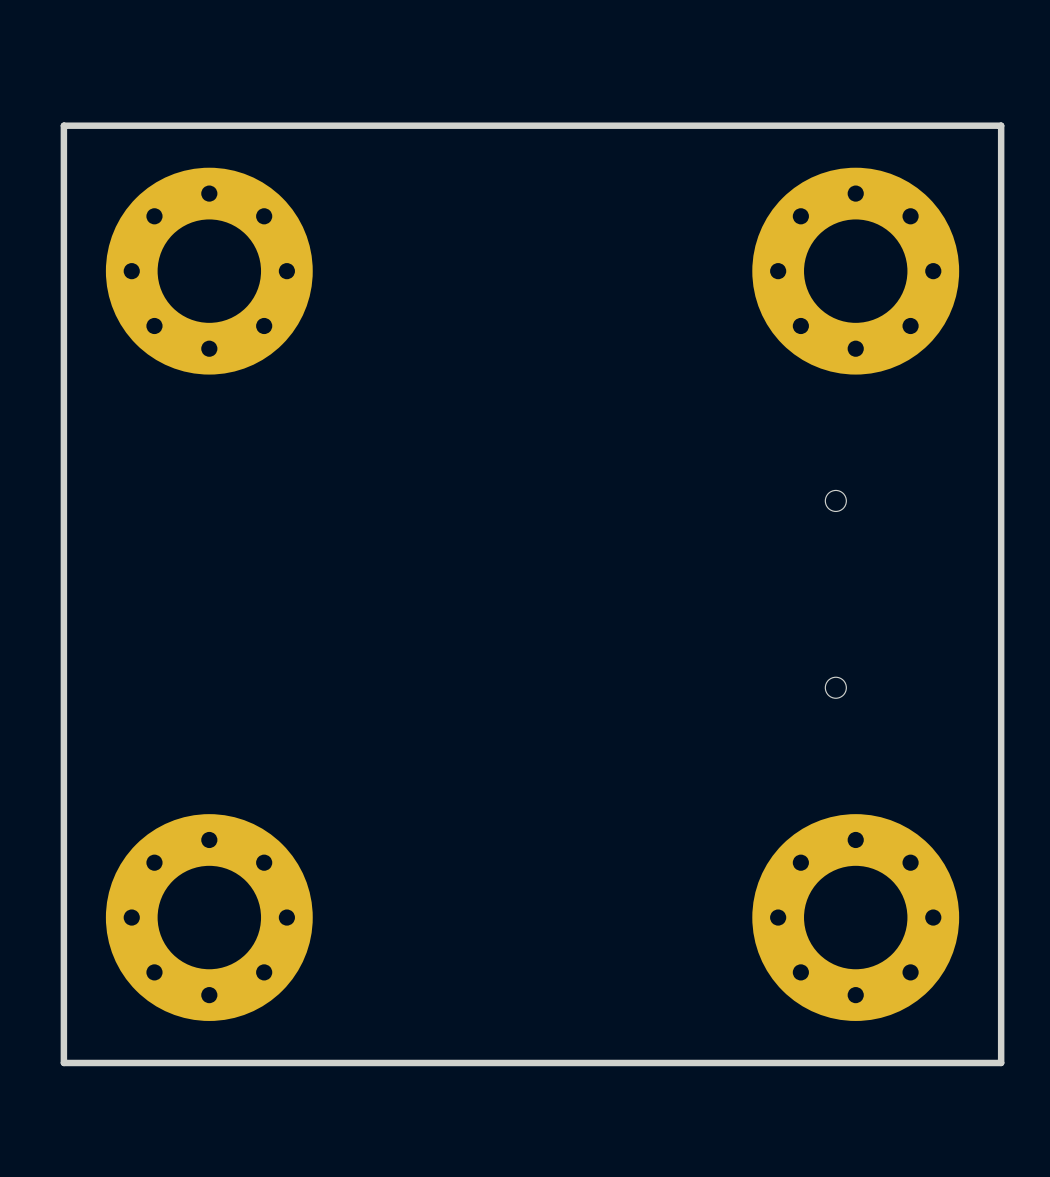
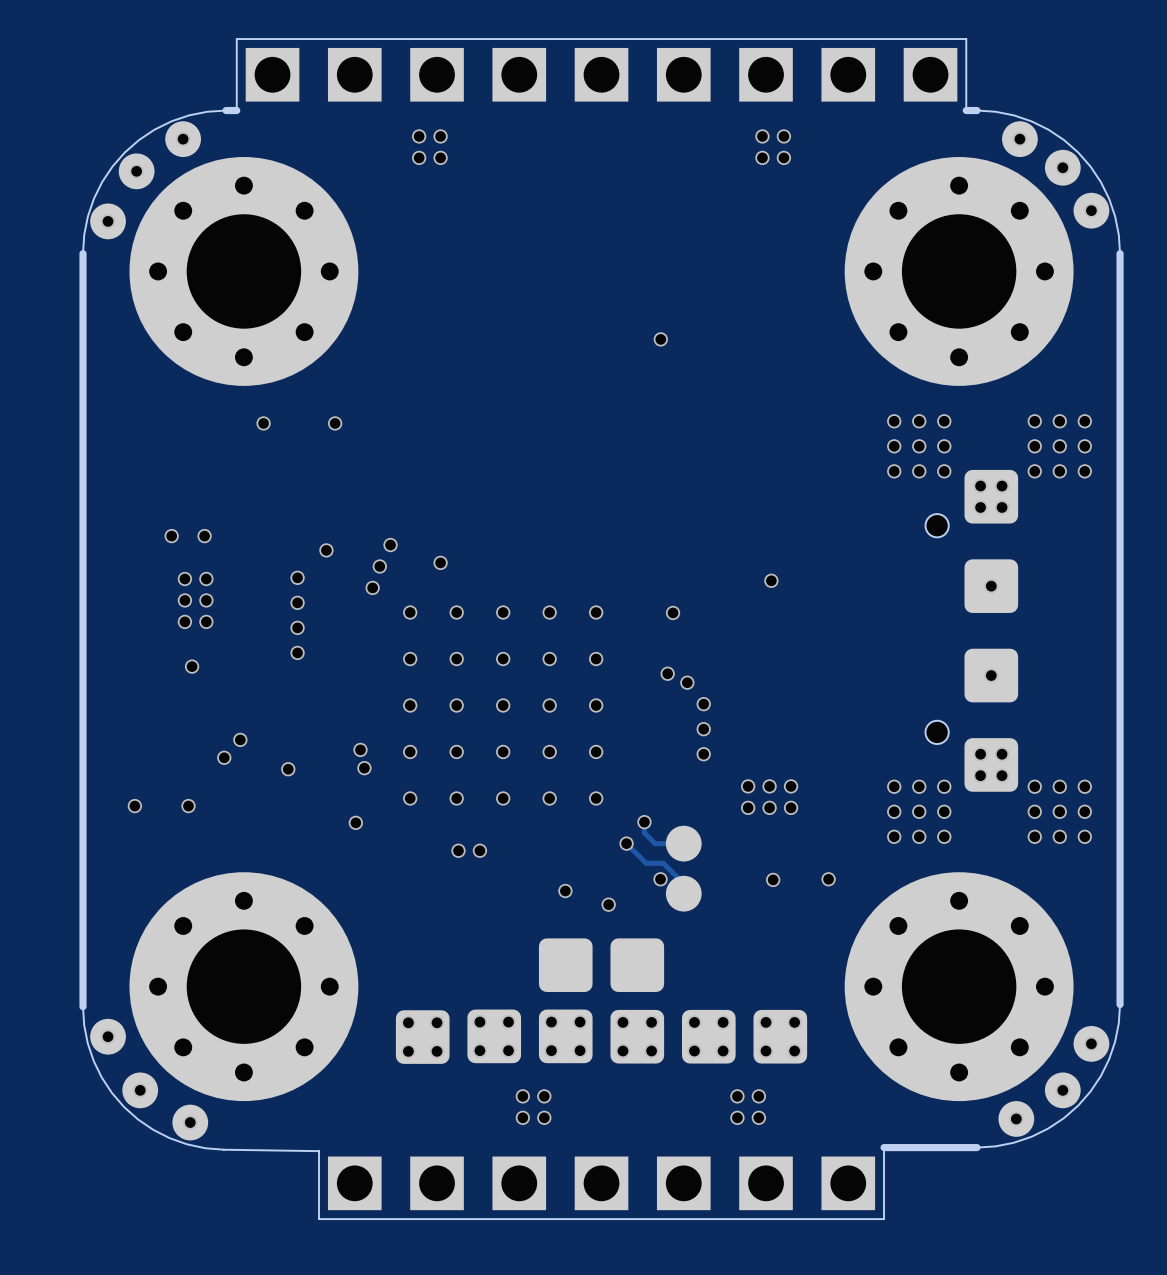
part: none -> (272, 74)
part: none -> (354, 74)
part: none -> (437, 74)
part: none -> (519, 74)
part: none -> (601, 74)
part: none -> (683, 74)
part: none -> (766, 74)
part: none -> (848, 74)
part: none -> (930, 74)
board edge: (193, 125) (63, 125) (63, 254) -> (226, 110) (207, 111) (171, 121) (138, 140) (124, 152) (102, 182) (93, 198) (84, 234) (83, 253)
board edge: (862, 125) (202, 125) -> (966, 110) (966, 39) (236, 39) (236, 110)
board edge: (871, 125) (1001, 125) (1001, 254) -> (977, 110) (995, 111) (1031, 121) (1064, 140) (1078, 152) (1090, 166) (1109, 198) (1118, 234) (1120, 253)
via: none -> (419, 136)
via: none -> (440, 136)
via: none -> (762, 136)
via: none -> (783, 136)
part: none -> (183, 139)
via: none -> (183, 139)
part: none -> (1019, 139)
via: none -> (1019, 139)
via: none -> (419, 157)
via: none -> (440, 157)
via: none -> (762, 157)
via: none -> (783, 157)
part: none -> (1062, 167)
via: none -> (1062, 167)
part: none -> (136, 171)
via: none -> (136, 171)
part: none -> (1091, 210)
via: none -> (1091, 210)
part: none -> (108, 221)
via: none -> (108, 221)
via: none -> (660, 339)
via: none -> (894, 421)
via: none -> (919, 421)
via: none -> (944, 421)
via: none -> (1034, 421)
via: none -> (1059, 421)
via: none -> (1084, 421)
via: none -> (263, 423)
via: none -> (335, 423)
via: none -> (894, 446)
via: none -> (919, 446)
via: none -> (944, 446)
via: none -> (1034, 446)
via: none -> (1059, 446)
via: none -> (1084, 446)
via: none -> (894, 471)
via: none -> (919, 471)
via: none -> (944, 471)
via: none -> (1034, 471)
via: none -> (1059, 471)
via: none -> (1084, 471)
via: none -> (980, 486)
via: none -> (1002, 486)
part: none -> (991, 496)
via: none -> (980, 507)
via: none -> (1002, 507)
via: none -> (171, 536)
via: none -> (204, 536)
via: none -> (390, 545)
via: none -> (326, 550)
via: none -> (440, 562)
via: none -> (379, 566)
via: none -> (297, 577)
via: none -> (184, 578)
via: none -> (206, 578)
via: none -> (771, 580)
part: none -> (991, 586)
via: none -> (991, 586)
via: none -> (372, 587)
via: none -> (184, 600)
via: none -> (206, 600)
via: none -> (297, 602)
via: none -> (410, 612)
via: none -> (456, 612)
via: none -> (503, 612)
via: none -> (549, 612)
via: none -> (596, 612)
via: none -> (673, 612)
via: none -> (184, 621)
via: none -> (206, 621)
via: none -> (297, 627)
via: none -> (297, 652)
via: none -> (410, 659)
via: none -> (456, 659)
via: none -> (503, 659)
via: none -> (549, 659)
via: none -> (596, 659)
via: none -> (192, 666)
via: none -> (667, 673)
part: none -> (991, 675)
via: none -> (991, 675)
via: none -> (687, 682)
via: none -> (703, 704)
via: none -> (410, 705)
via: none -> (456, 705)
via: none -> (503, 705)
via: none -> (549, 705)
via: none -> (596, 705)
via: none -> (703, 729)
via: none -> (240, 739)
via: none -> (360, 749)
via: none -> (410, 751)
via: none -> (456, 751)
via: none -> (503, 751)
via: none -> (549, 751)
via: none -> (596, 751)
via: none -> (703, 754)
via: none -> (980, 754)
via: none -> (1002, 754)
via: none -> (224, 757)
part: none -> (991, 764)
via: none -> (364, 768)
via: none -> (288, 769)
via: none -> (980, 775)
via: none -> (1002, 775)
via: none -> (748, 786)
via: none -> (769, 786)
via: none -> (791, 786)
via: none -> (894, 786)
via: none -> (919, 786)
via: none -> (944, 786)
via: none -> (1034, 786)
via: none -> (1059, 786)
via: none -> (1084, 786)
via: none -> (410, 798)
via: none -> (456, 798)
via: none -> (503, 798)
via: none -> (549, 798)
via: none -> (596, 798)
via: none -> (134, 806)
via: none -> (188, 806)
via: none -> (748, 807)
via: none -> (769, 807)
via: none -> (791, 807)
via: none -> (894, 811)
via: none -> (919, 811)
via: none -> (944, 811)
via: none -> (1034, 811)
via: none -> (1059, 811)
via: none -> (1084, 811)
track: none -> (644, 822) (644, 832) (655, 843) (683, 843)
via: none -> (644, 822)
via: none -> (355, 822)
via: none -> (894, 836)
via: none -> (919, 836)
via: none -> (944, 836)
via: none -> (1034, 836)
via: none -> (1059, 836)
via: none -> (1084, 836)
track: none -> (626, 843) (646, 863) (663, 863) (683, 883) (683, 893)
via: none -> (626, 843)
part: none -> (683, 843)
via: none -> (458, 850)
via: none -> (479, 850)
via: none -> (660, 879)
via: none -> (828, 879)
via: none -> (773, 879)
via: none -> (565, 891)
part: none -> (683, 893)
via: none -> (608, 904)
part: none -> (565, 965)
part: none -> (637, 965)
board edge: (1001, 933) (1001, 1062) (871, 1062) -> (1120, 1004) (1115, 1041) (1109, 1059) (1090, 1091) (1078, 1105) (1048, 1128) (1031, 1136) (995, 1146) (977, 1147)
board edge: (63, 935) (63, 1062) (787, 1062) -> (83, 1006) (87, 1043) (101, 1077) (124, 1107) (153, 1129) (187, 1144) (205, 1148) (319, 1151) (319, 1219) (884, 1219) (884, 1147)
via: none -> (479, 1022)
via: none -> (508, 1022)
via: none -> (551, 1022)
via: none -> (580, 1022)
via: none -> (622, 1022)
via: none -> (651, 1022)
via: none -> (694, 1022)
via: none -> (723, 1022)
via: none -> (766, 1022)
via: none -> (794, 1022)
via: none -> (408, 1022)
via: none -> (437, 1022)
part: none -> (108, 1036)
via: none -> (108, 1036)
part: none -> (494, 1036)
part: none -> (565, 1036)
part: none -> (637, 1036)
part: none -> (708, 1036)
part: none -> (780, 1036)
part: none -> (422, 1037)
part: none -> (1091, 1043)
via: none -> (1091, 1043)
via: none -> (479, 1050)
via: none -> (508, 1050)
via: none -> (551, 1050)
via: none -> (580, 1050)
via: none -> (622, 1051)
via: none -> (651, 1051)
via: none -> (694, 1051)
via: none -> (723, 1051)
via: none -> (766, 1051)
via: none -> (794, 1051)
via: none -> (408, 1051)
via: none -> (437, 1051)
part: none -> (140, 1090)
via: none -> (140, 1090)
part: none -> (1062, 1090)
via: none -> (1062, 1090)
via: none -> (522, 1096)
via: none -> (544, 1096)
via: none -> (737, 1096)
via: none -> (758, 1096)
via: none -> (522, 1117)
via: none -> (544, 1117)
via: none -> (737, 1117)
via: none -> (758, 1117)
part: none -> (1016, 1118)
via: none -> (1016, 1118)
part: none -> (190, 1122)
via: none -> (190, 1122)
part: none -> (354, 1183)
part: none -> (437, 1183)
part: none -> (519, 1183)
part: none -> (601, 1183)
part: none -> (683, 1183)
part: none -> (766, 1183)
part: none -> (848, 1183)

